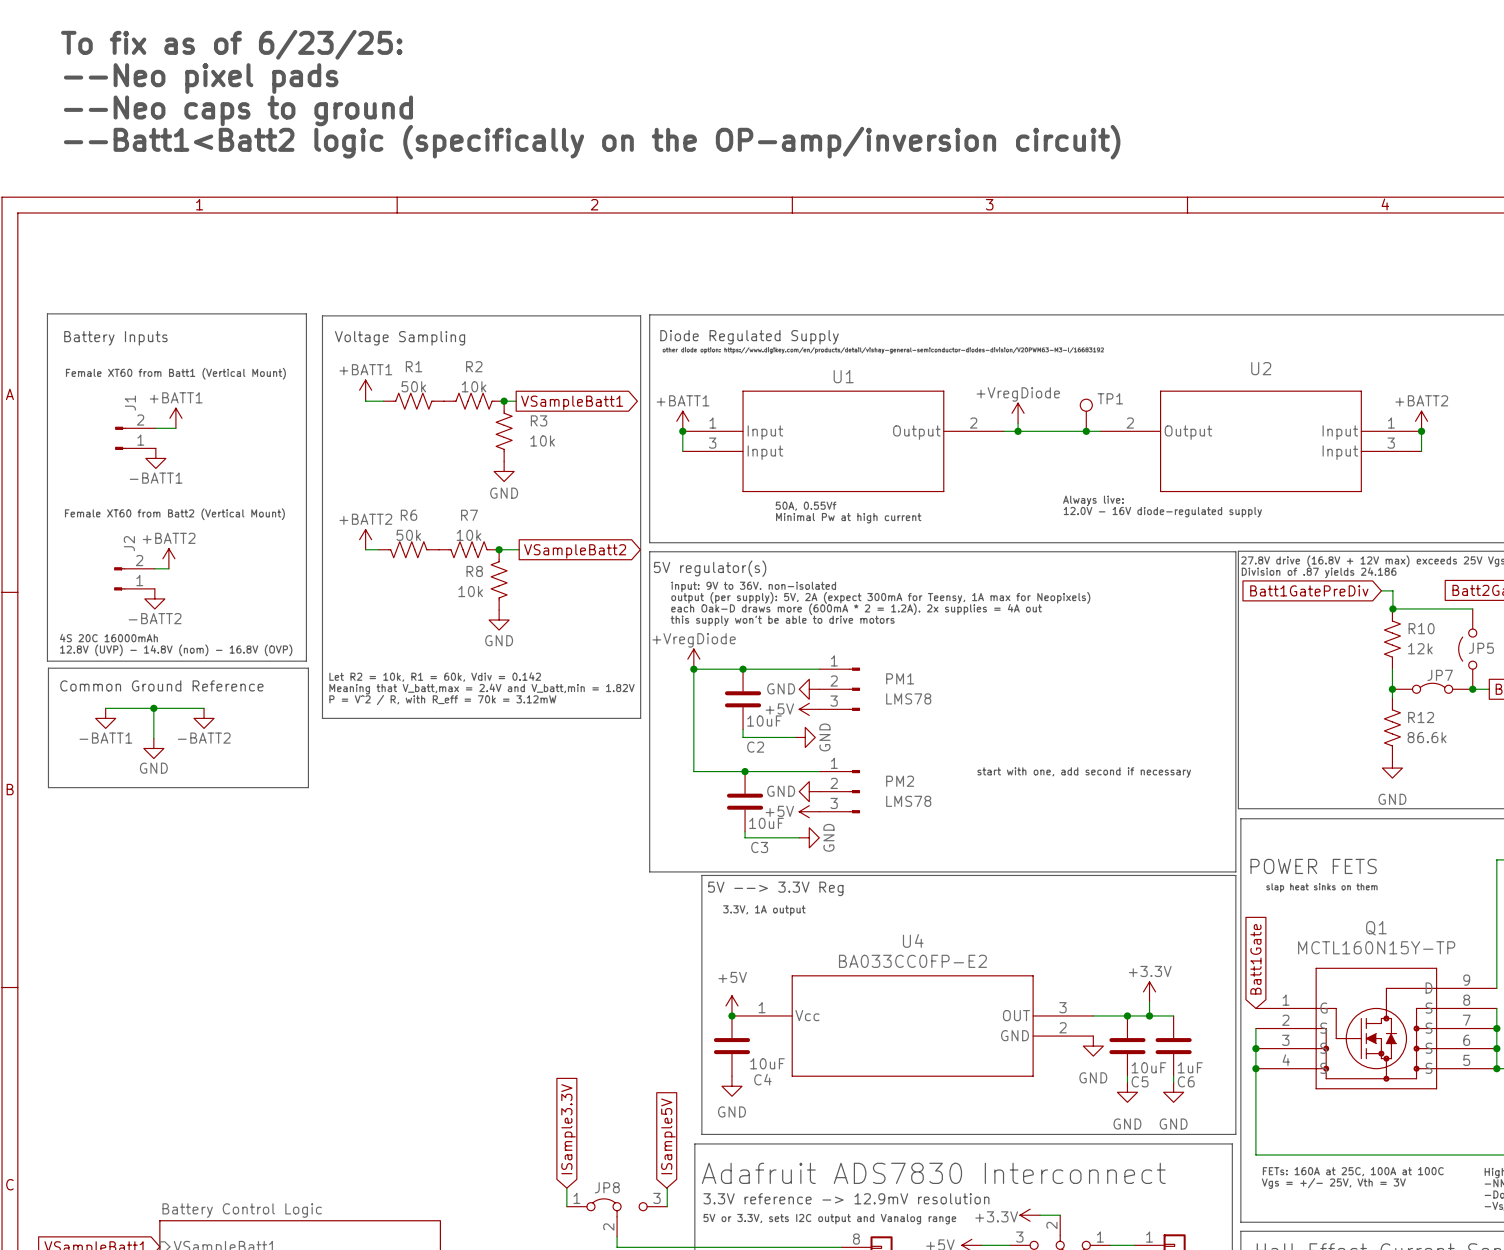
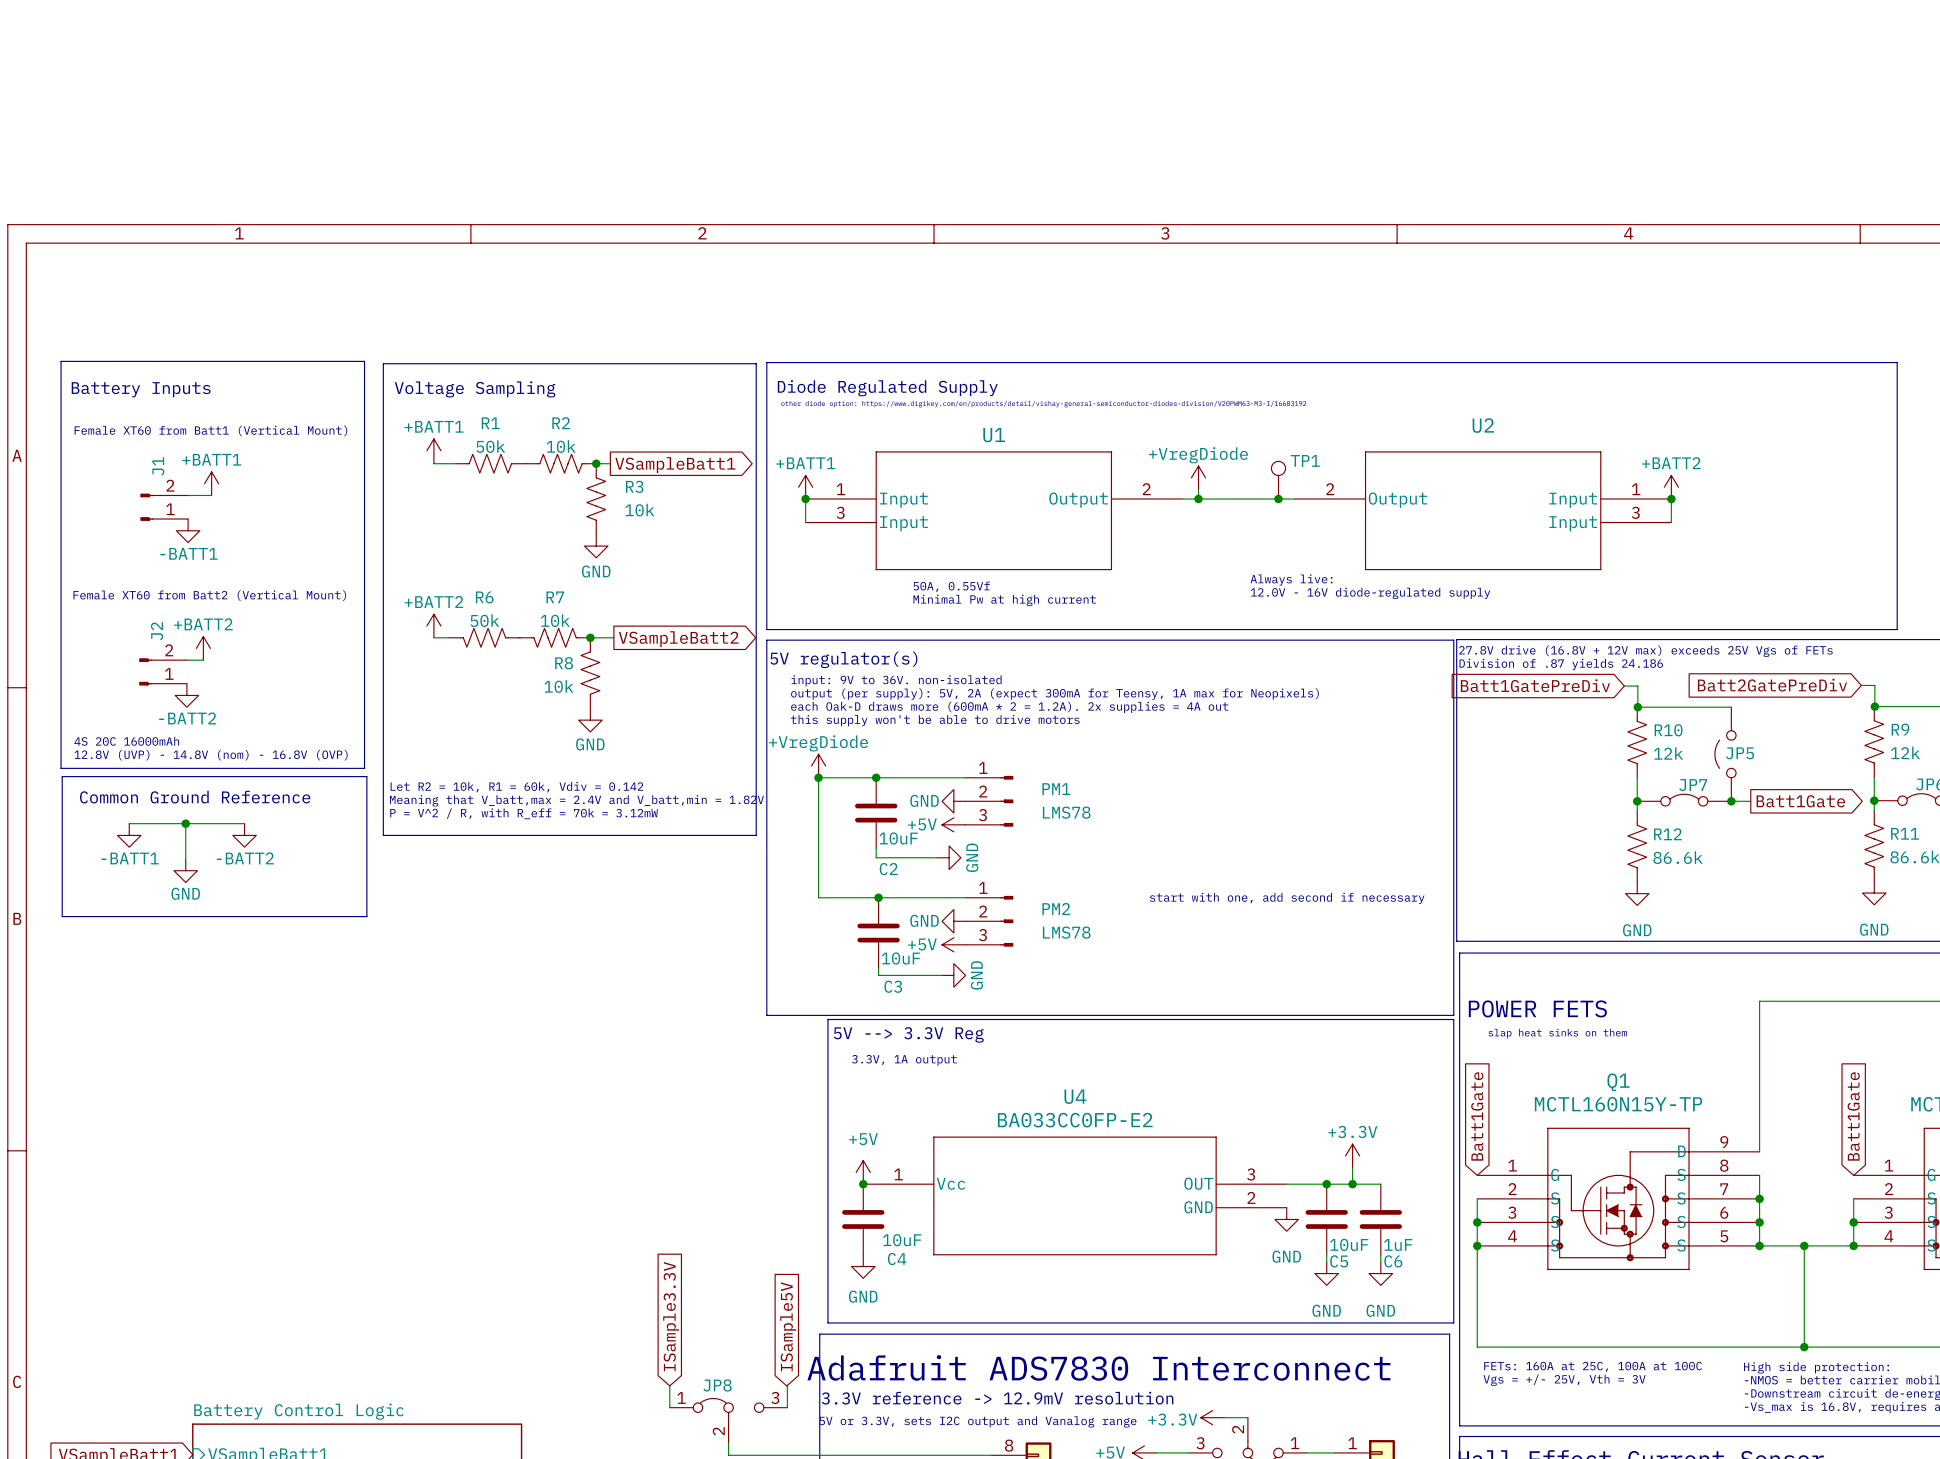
text: To fix as of 6/23/25: (231, 44) -> none
text: --Neo pixel pads (201, 78) -> none
text: --Neo caps to ground (238, 110) -> none
text: --Batt1<Batt2 logic (specifically on the OP-amp/inversion circuit) (592, 142) -> none

